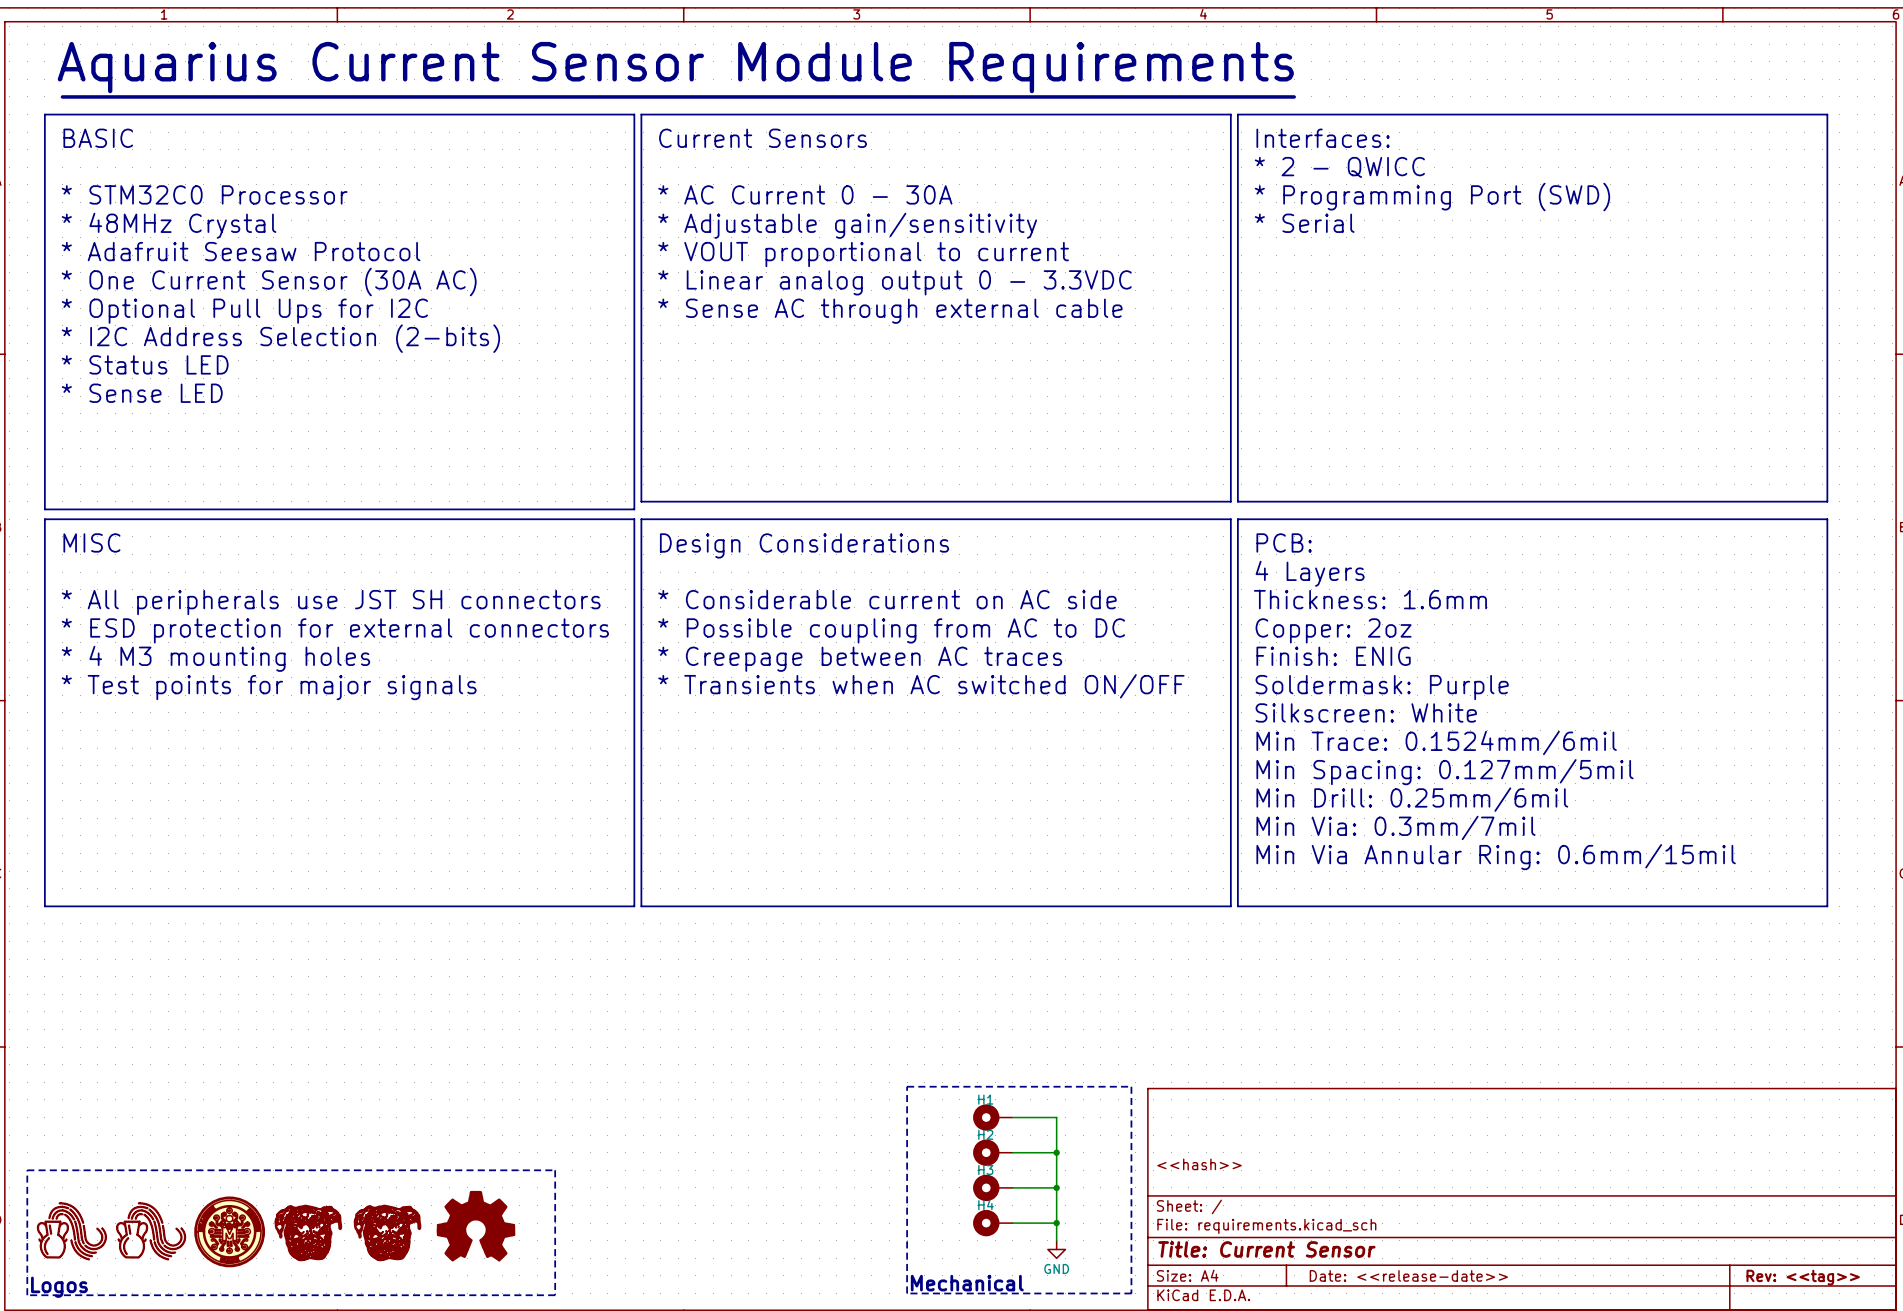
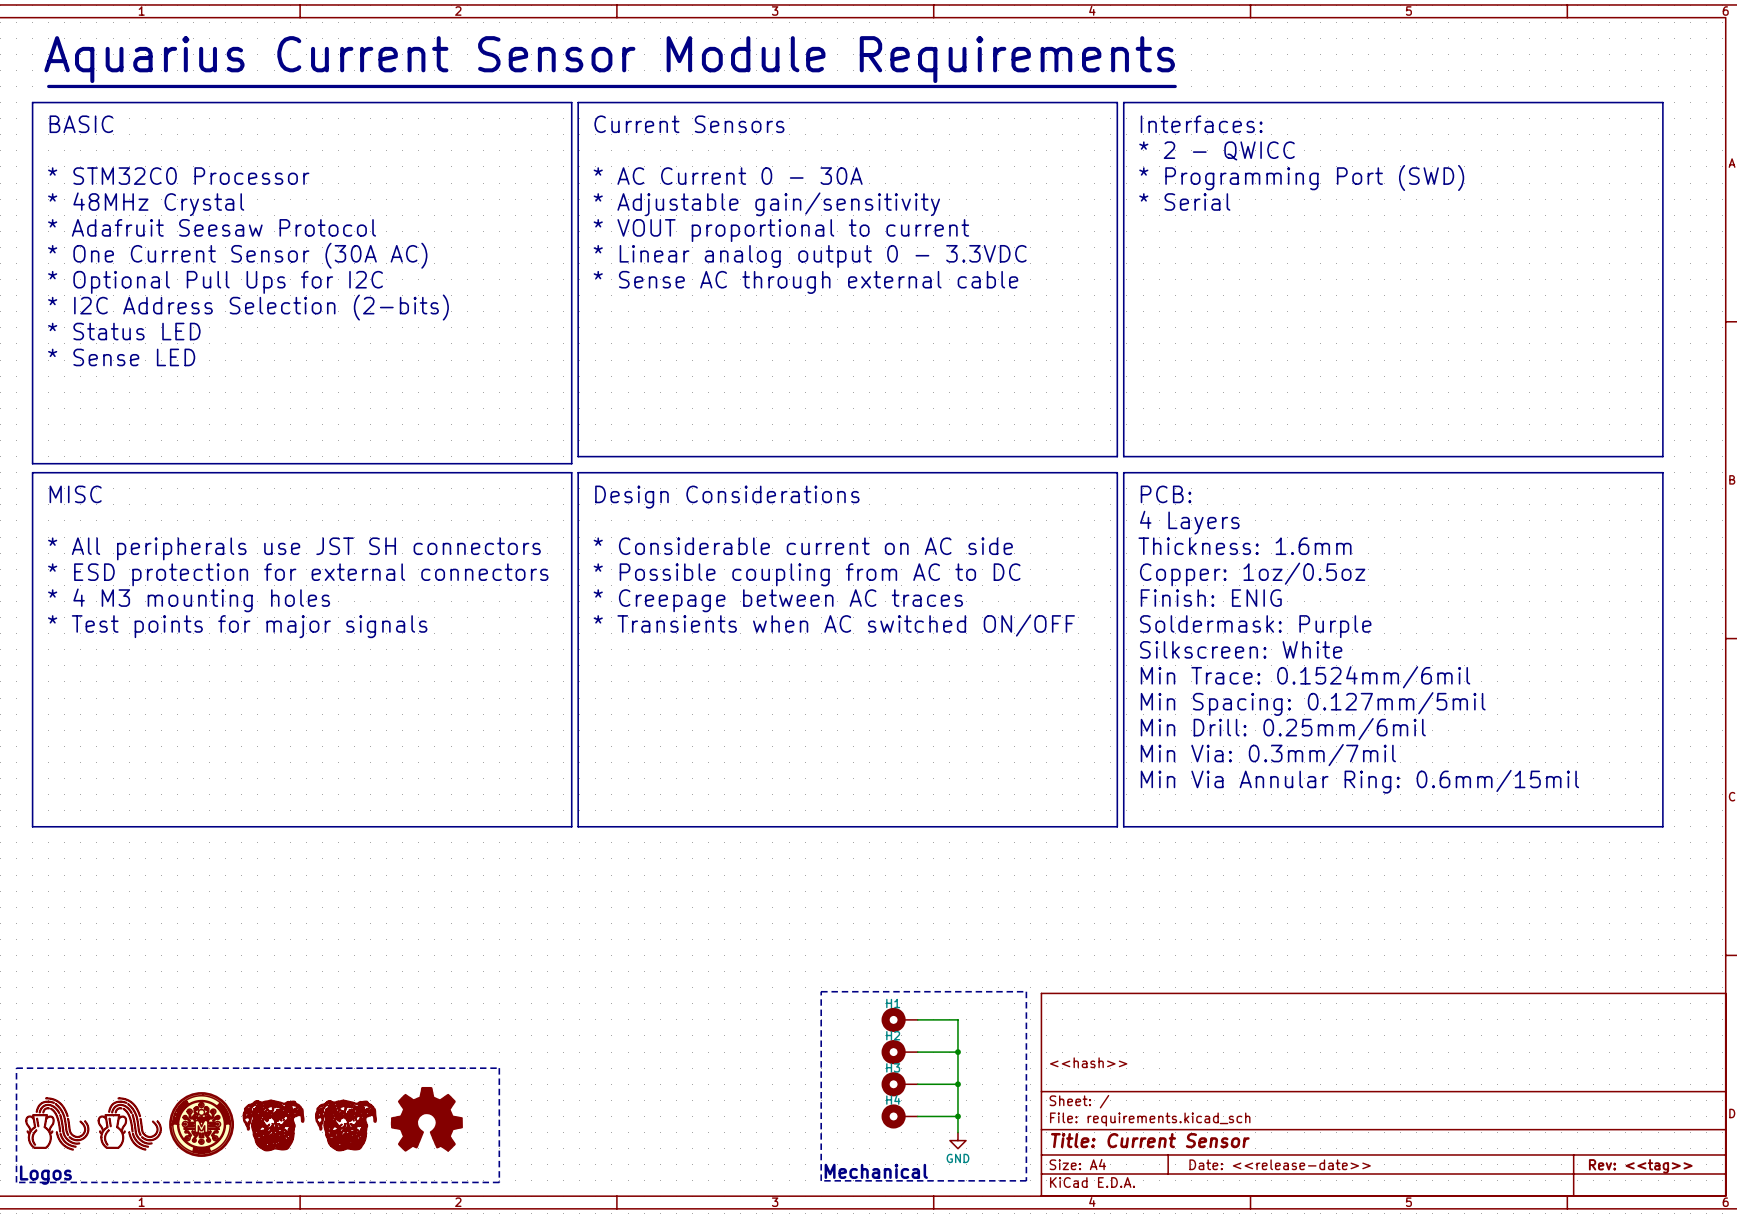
text: Copper: 2oz (1333, 630) -> Copper: 1oz/0.5oz (1252, 574)

